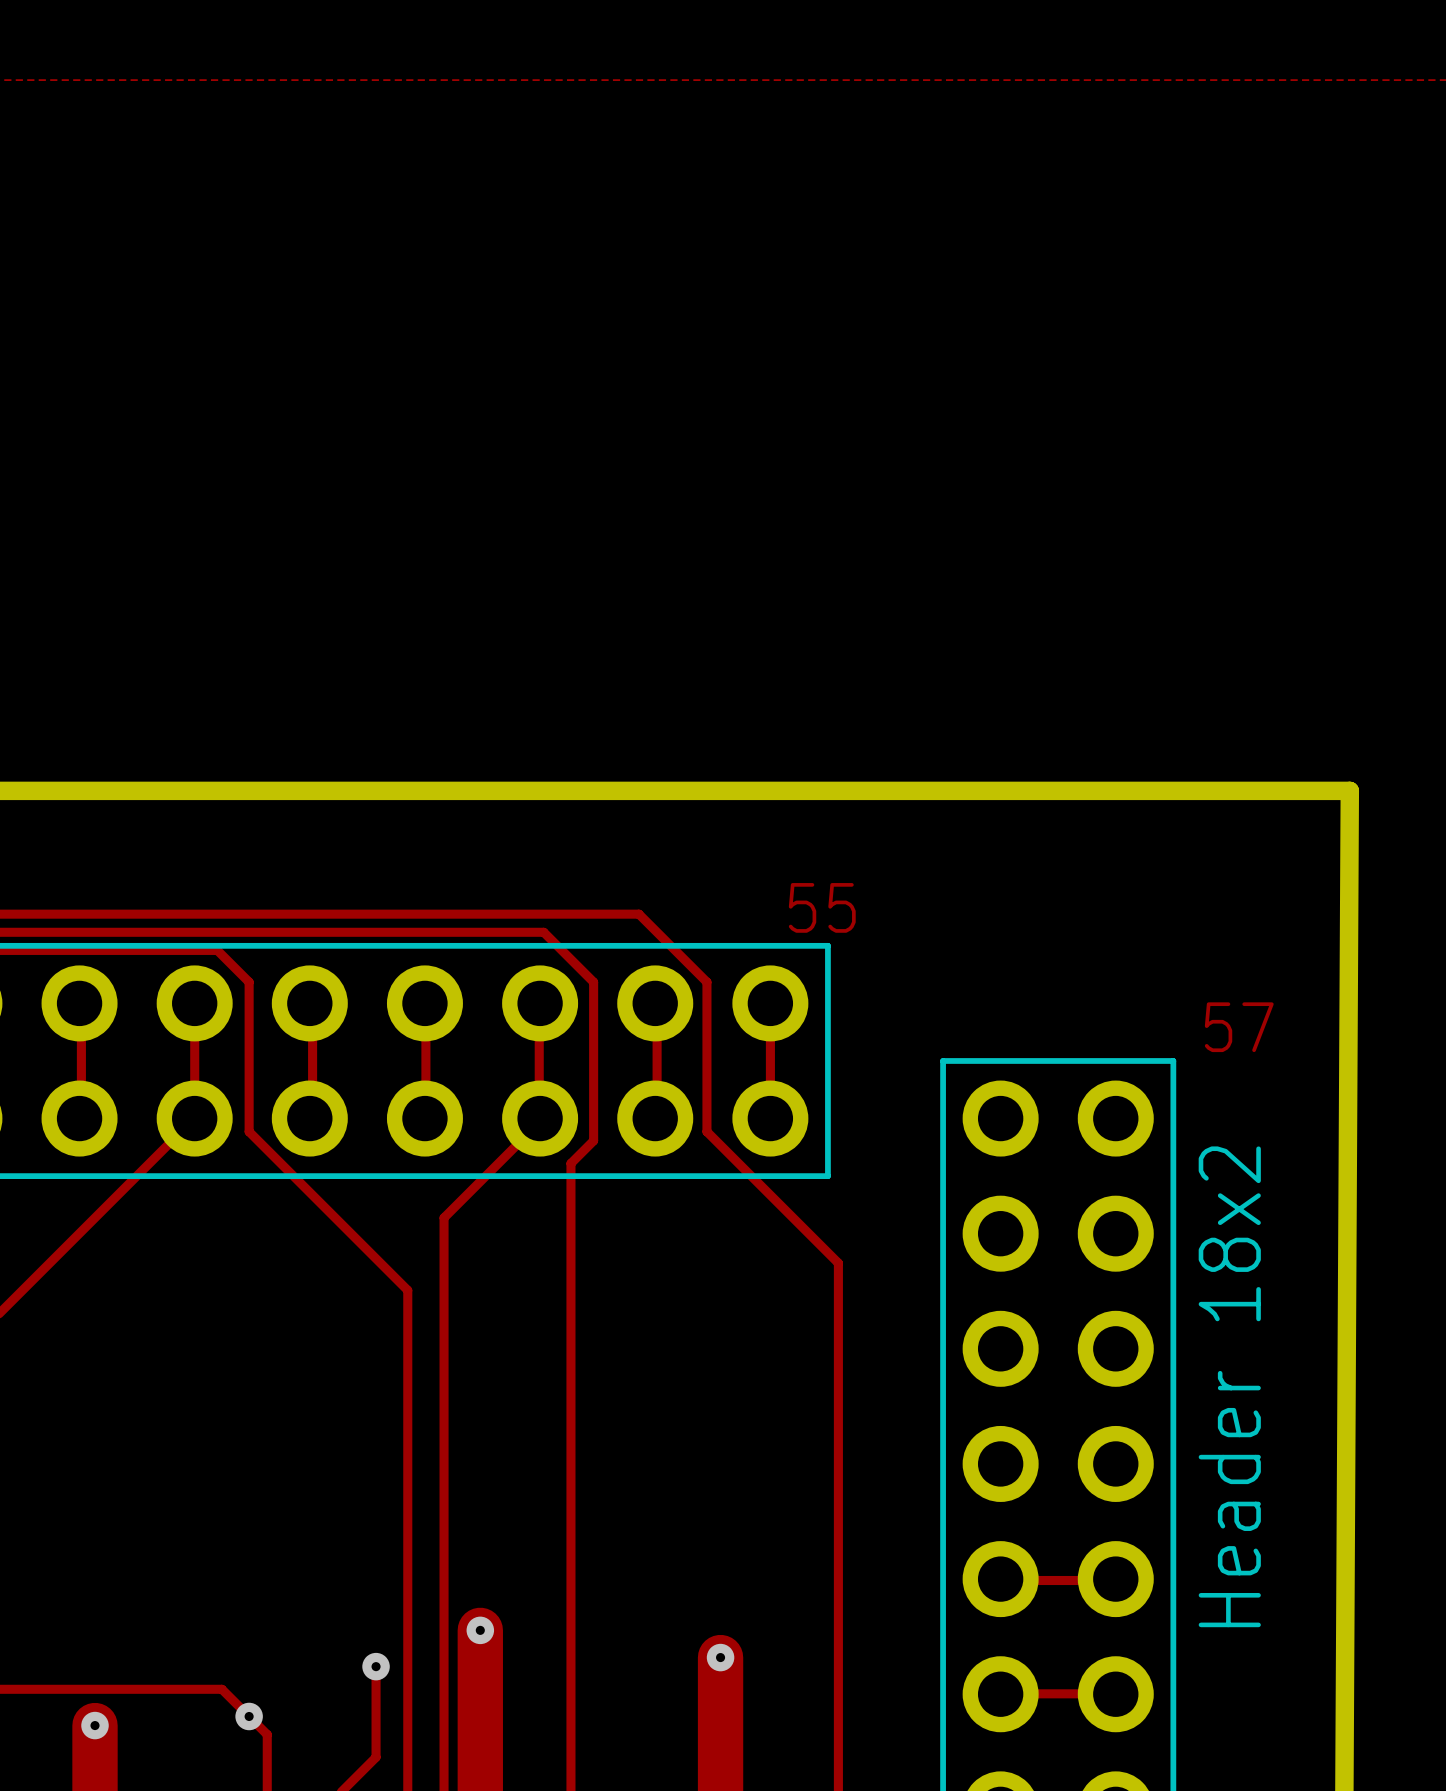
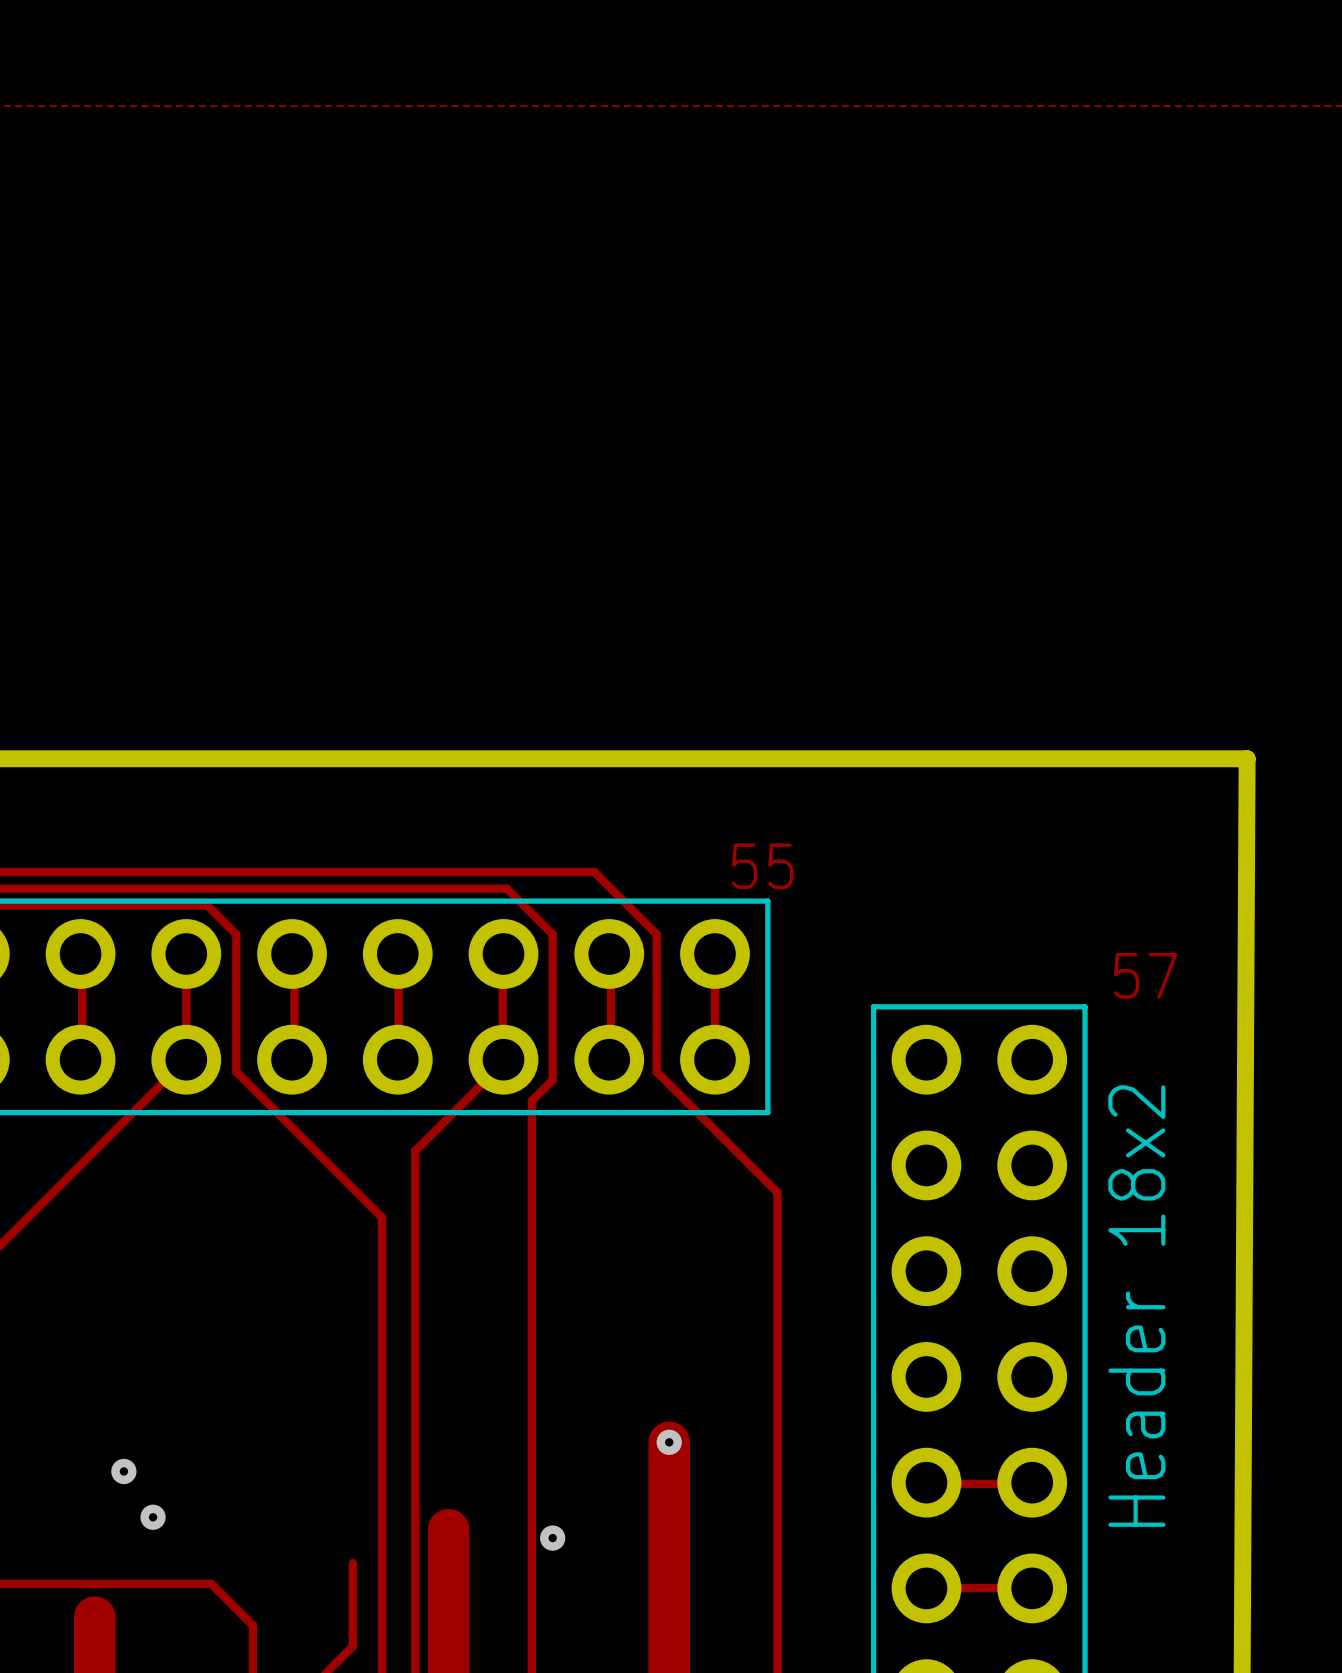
track: none -> (669, 1442) (669, 1554)
via: none -> (669, 1442)
via: none -> (123, 1471)
via: none -> (153, 1517)
via: (480, 1630) -> none
via: none -> (552, 1538)
via: (720, 1657) -> none
via: (376, 1666) -> none
via: (249, 1716) -> none
via: (95, 1725) -> none

